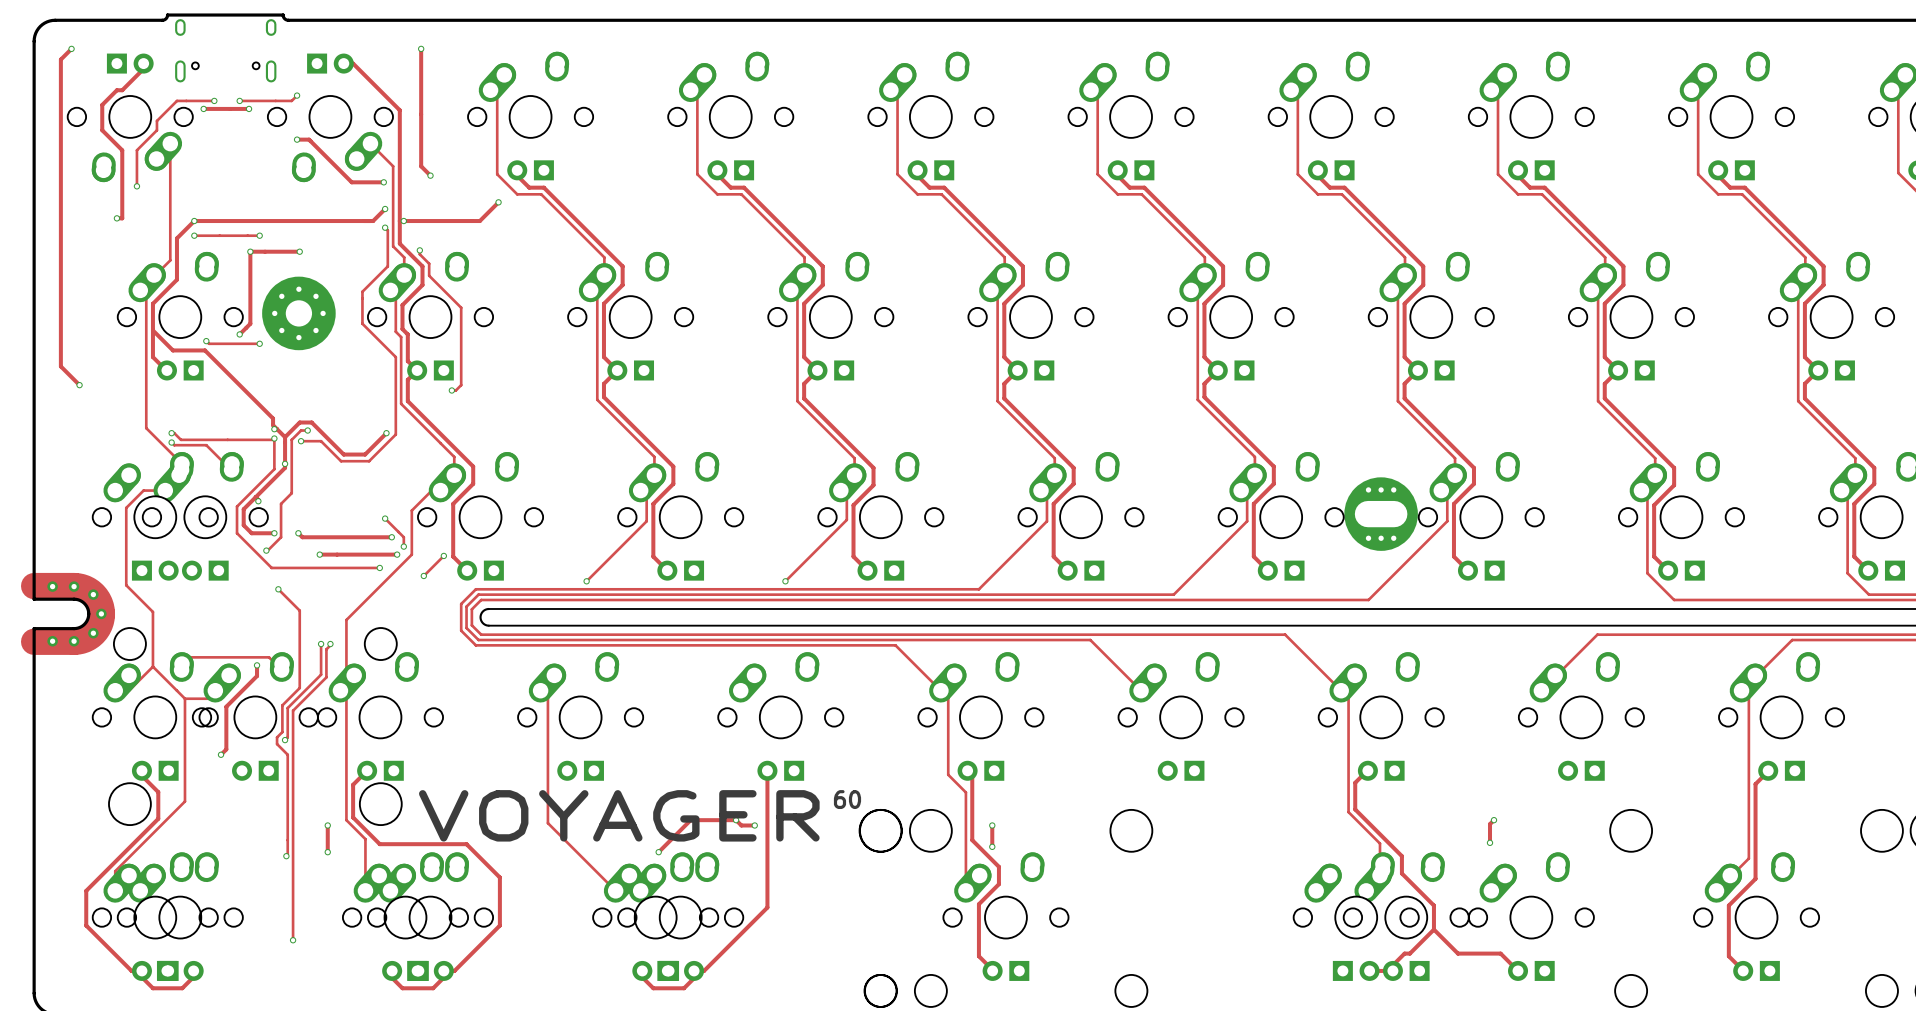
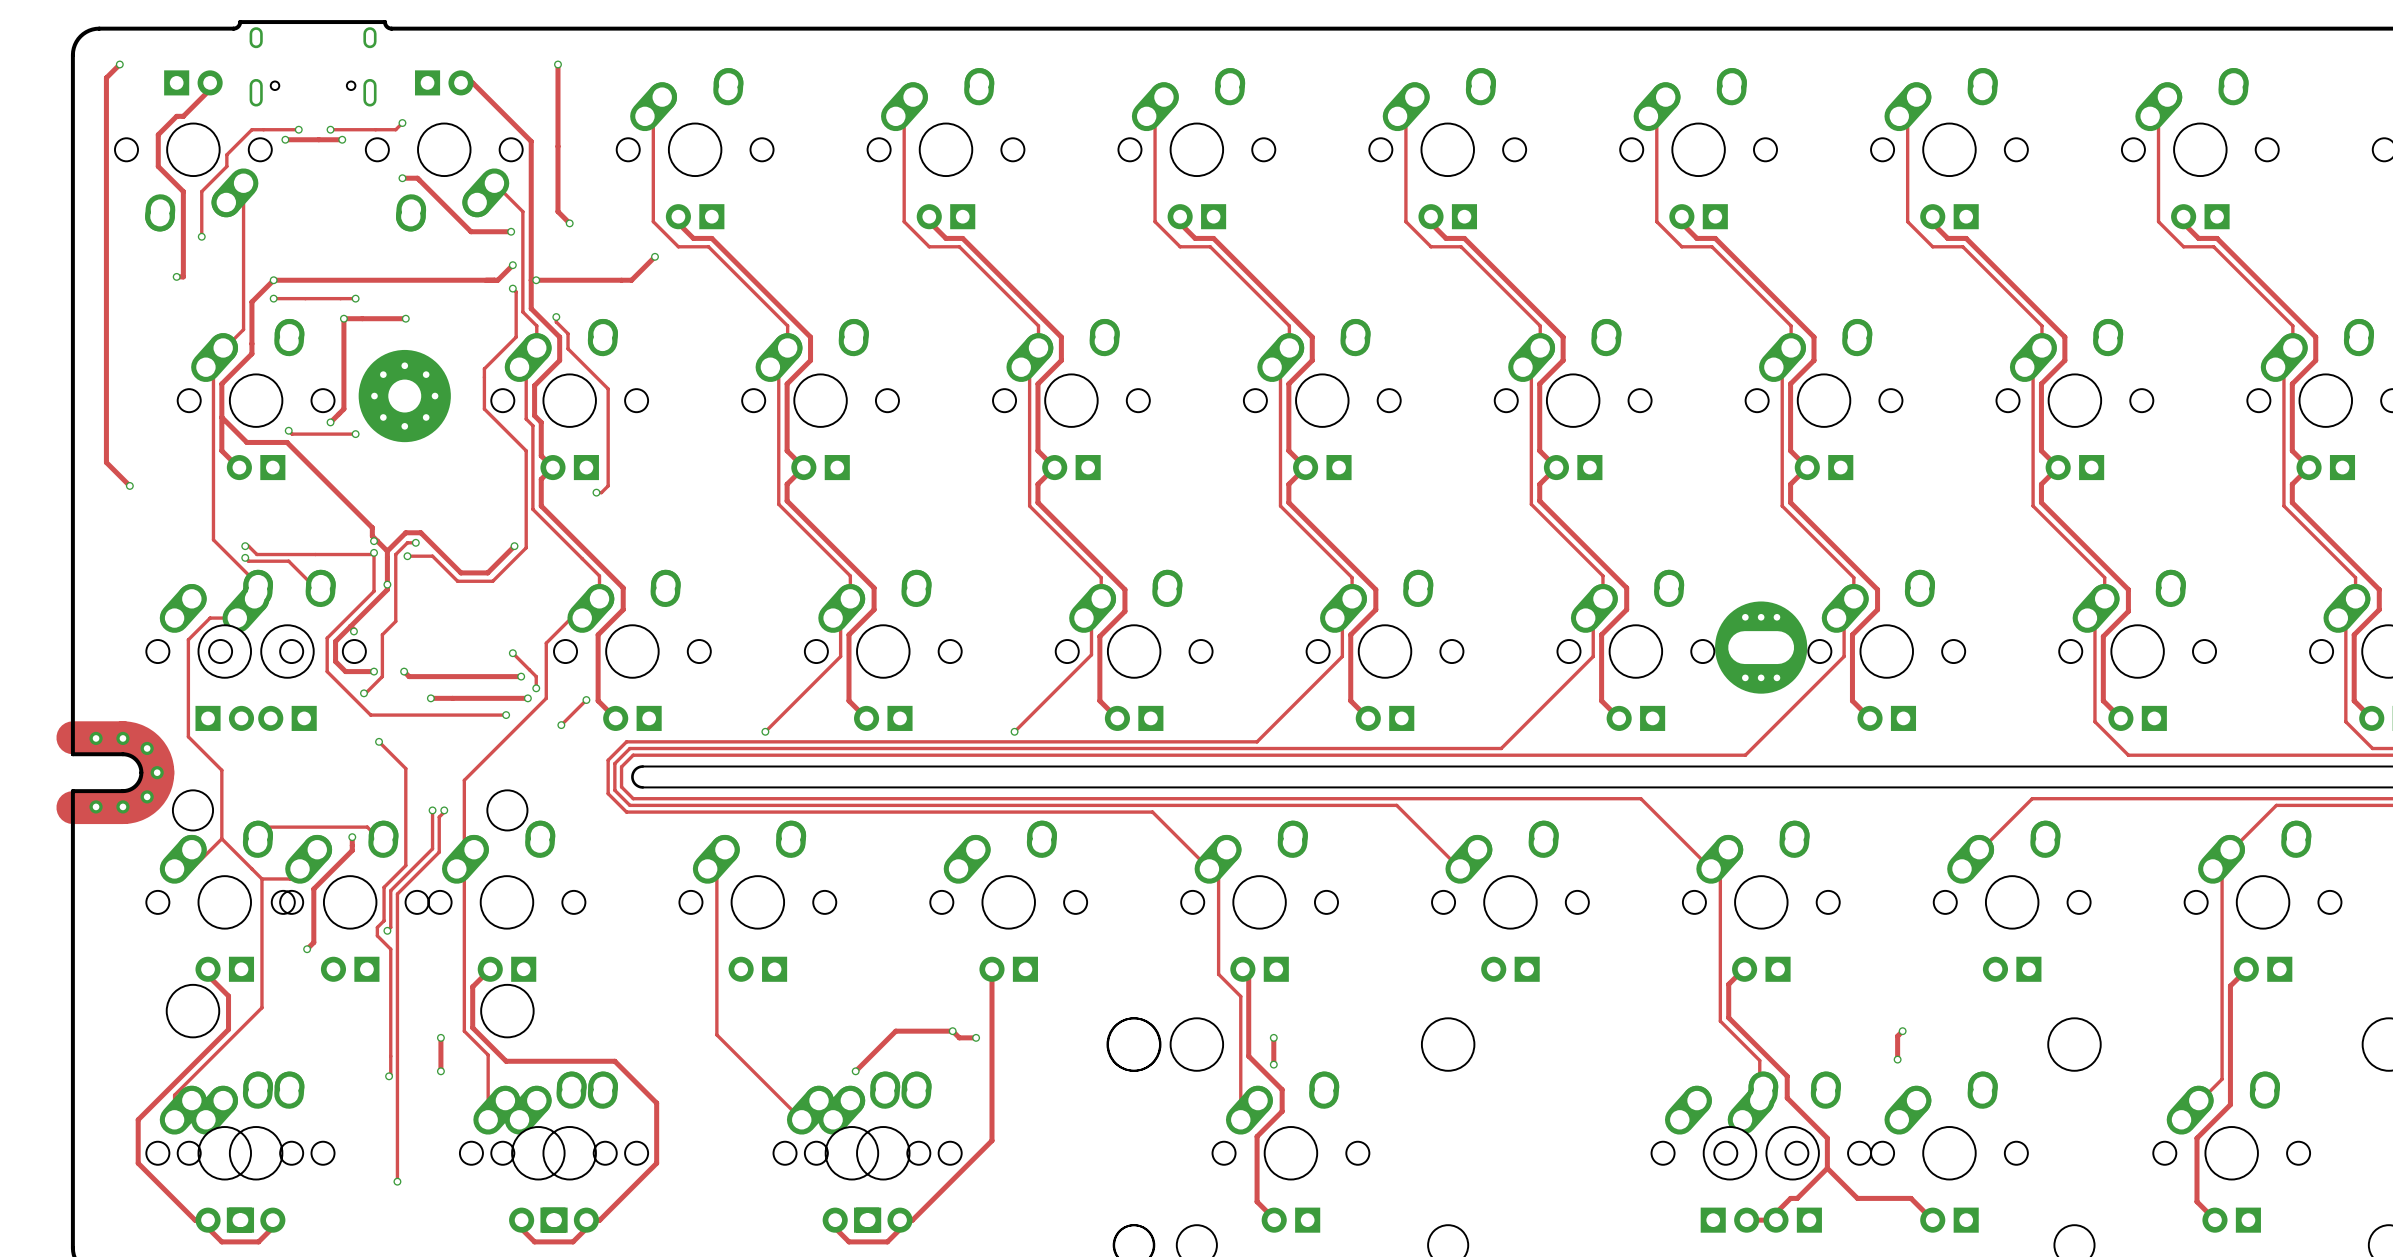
text: 60 (847, 799) -> none
text: VOYAGER (619, 815) -> none

